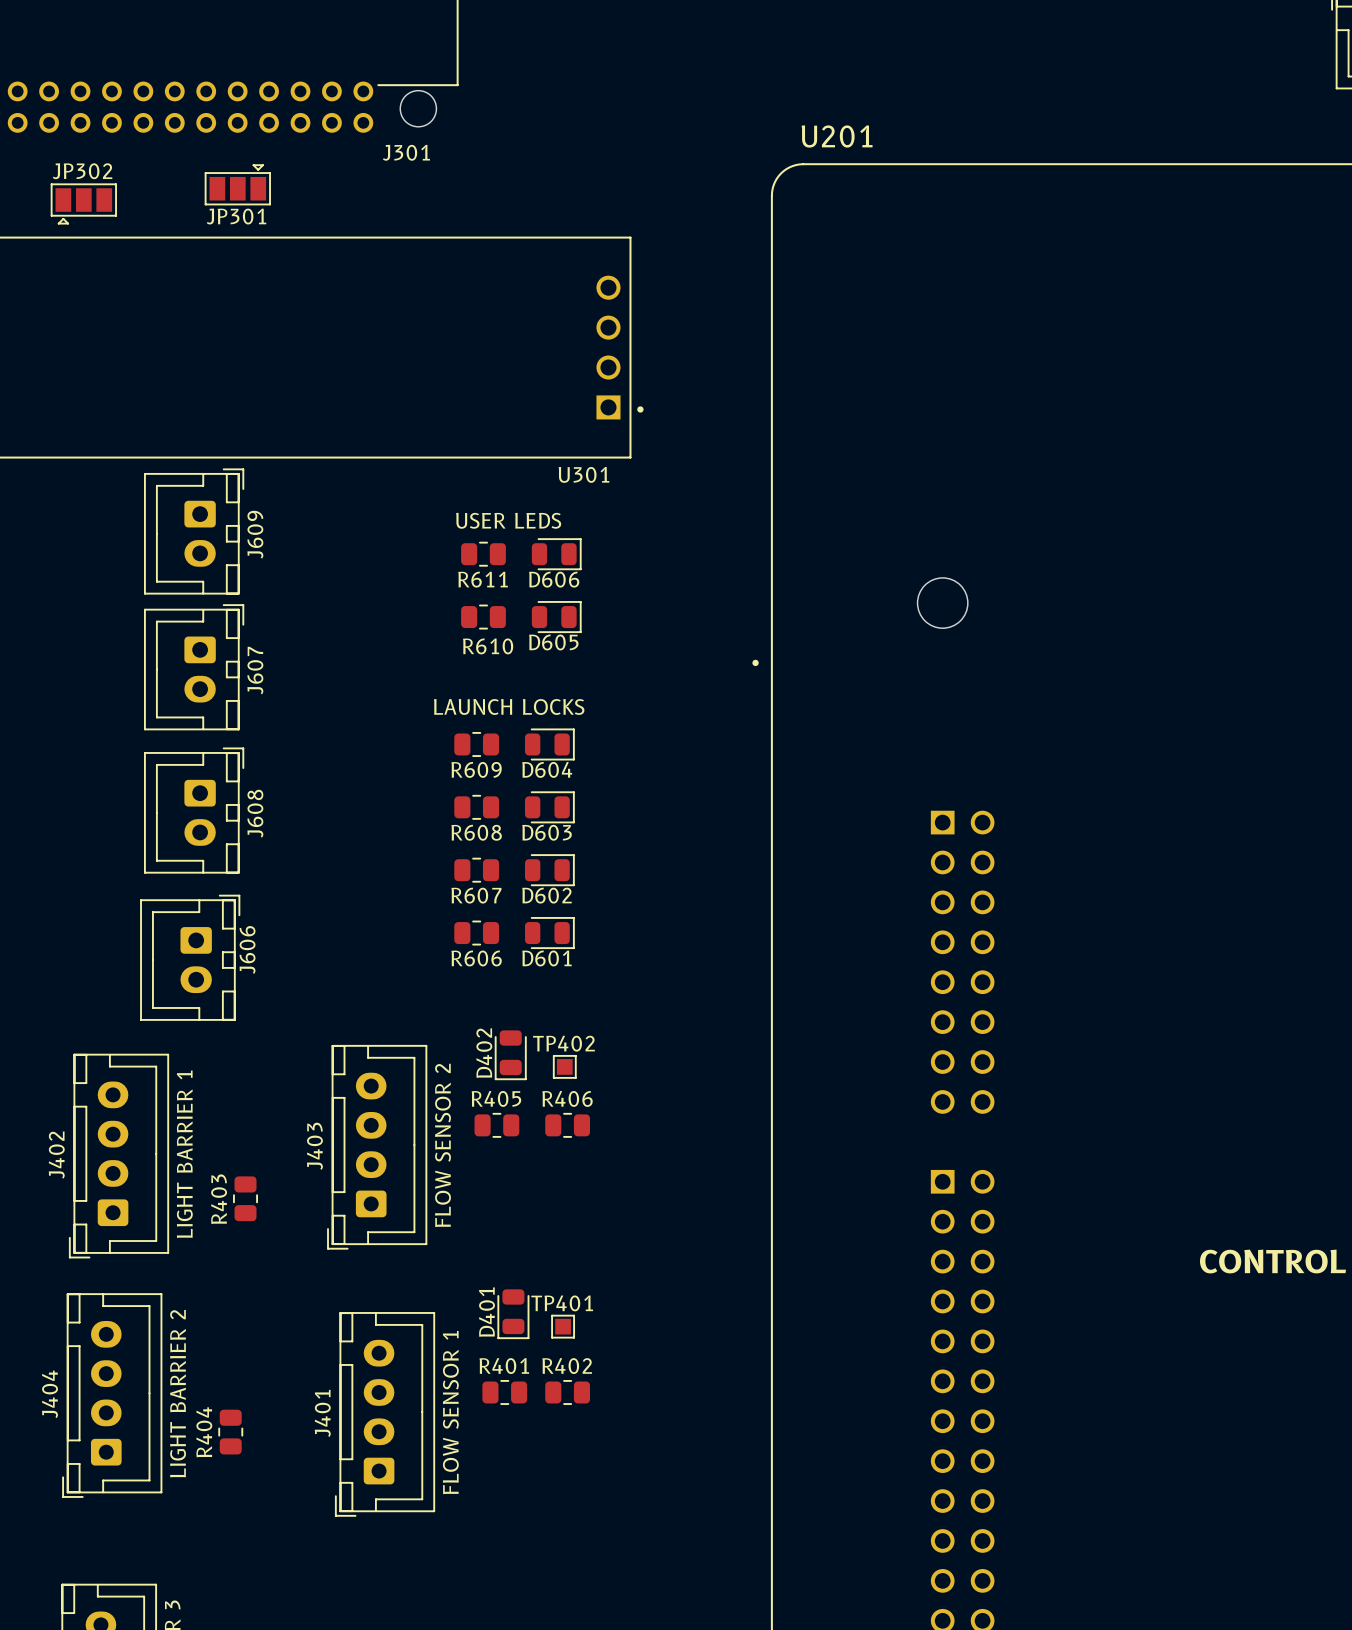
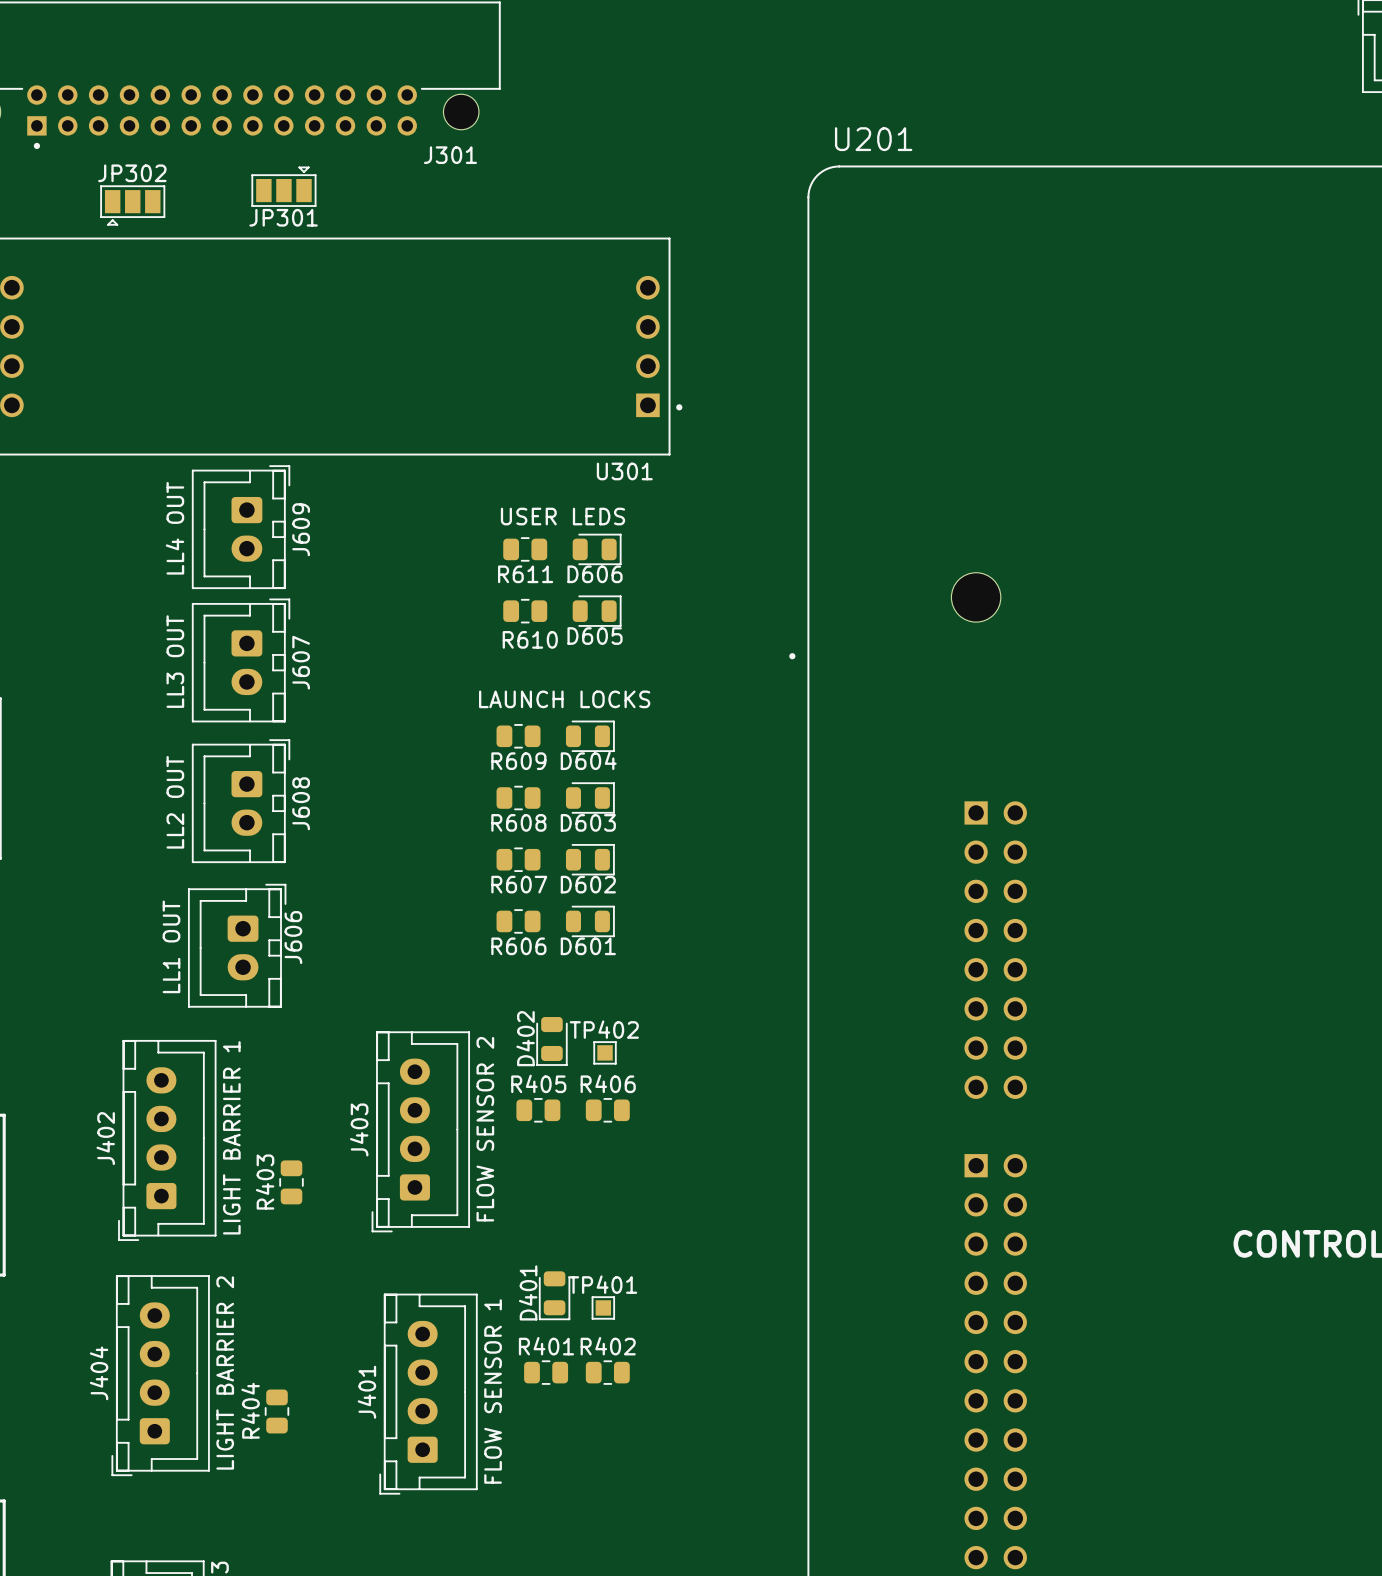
J609 value: none -> LL4 OUT (174, 528)
J607 value: none -> LL3 OUT (175, 661)
J608 value: none -> LL2 OUT (175, 802)
J606 value: none -> LL1 OUT (171, 946)

